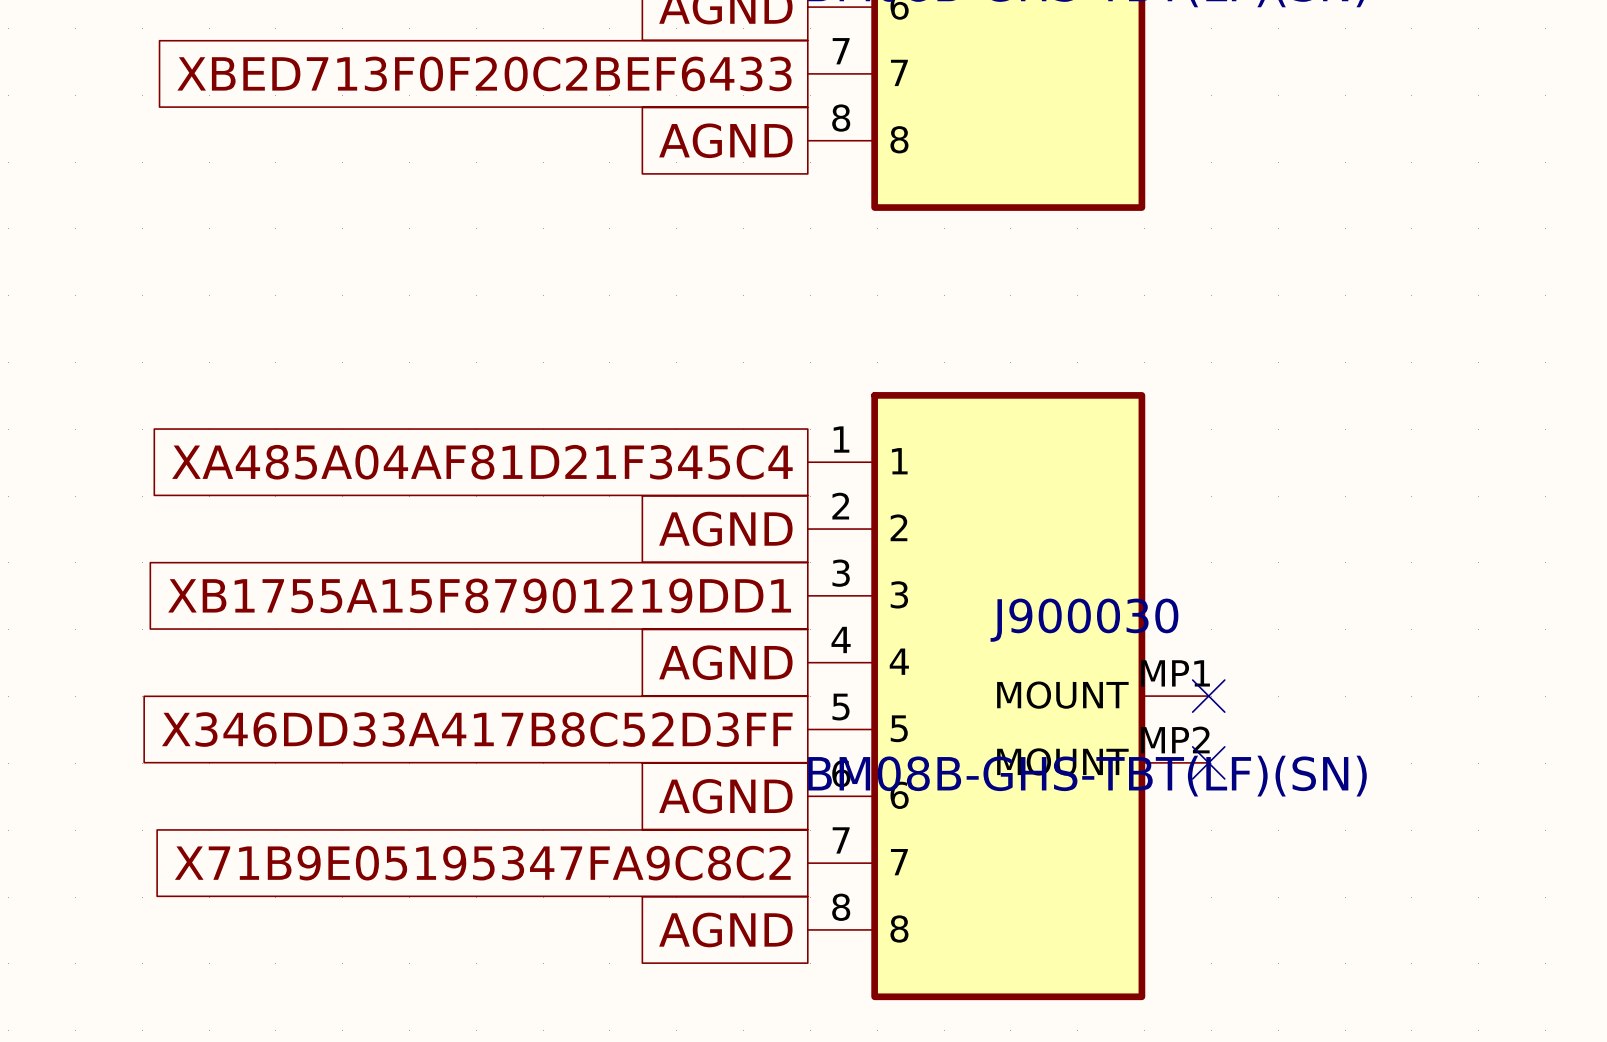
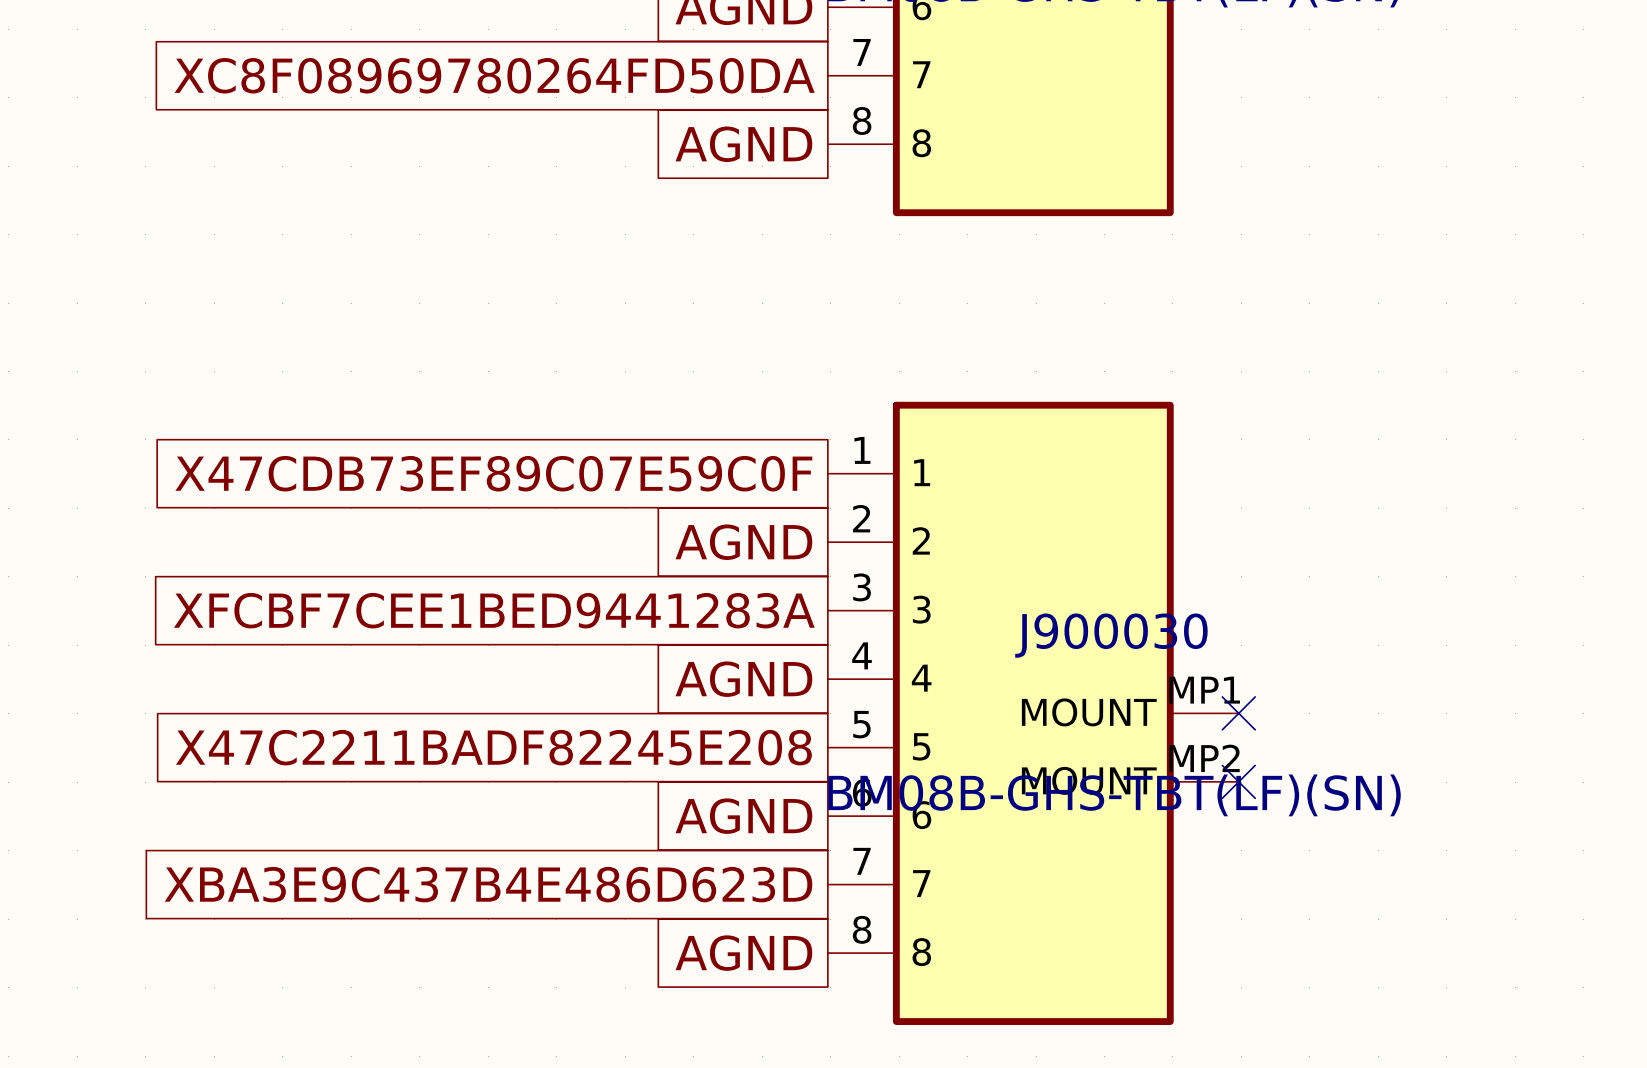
global label: XBED713F0F20C2BEF6433 (484, 73) -> XC8F08969780264FD50DA (494, 75)
global label: XA485A04AF81D21F345C4 (482, 462) -> X47CDB73EF89C07E59C0F (493, 473)
global label: XB1755A15F87901219DD1 (479, 595) -> XFCBF7CEE1BED9441283A (494, 610)
global label: X346DD33A417B8C52D3FF (477, 729) -> X47C2211BADF82245E208 (493, 747)
global label: X71B9E05195347FA9C8C2 (482, 863) -> XBA3E9C437B4E486D623D (488, 884)

